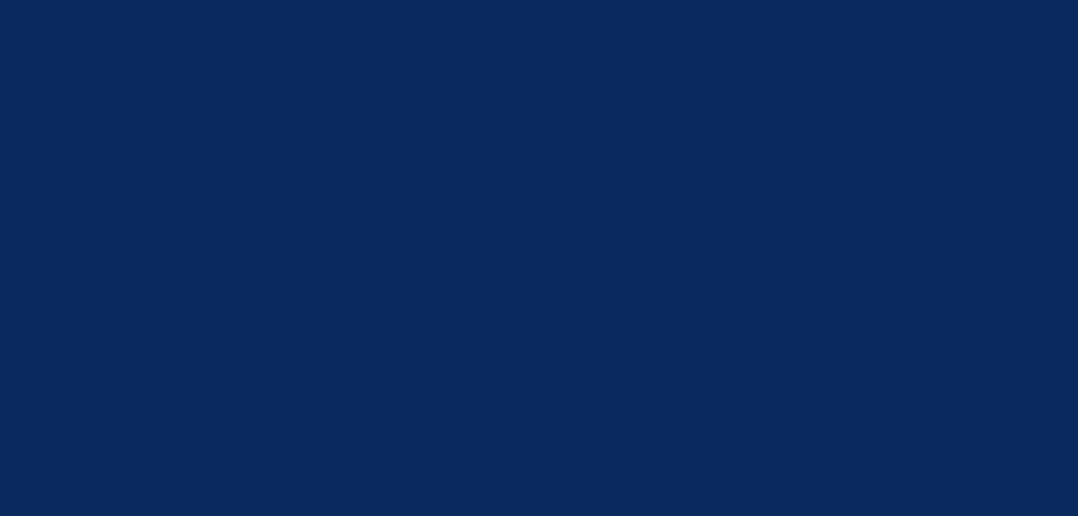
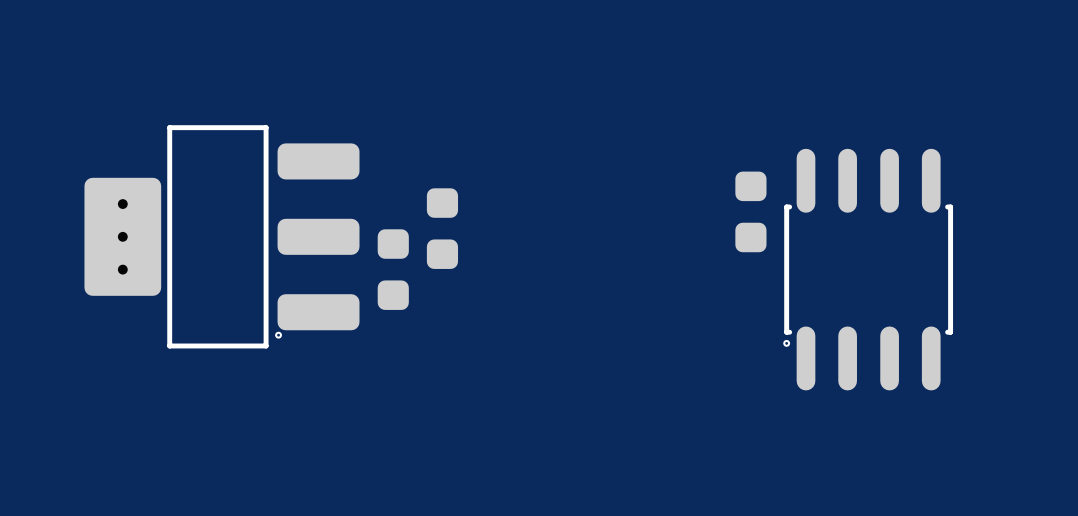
part: none -> (750, 211)
part: none -> (442, 228)
part: none -> (221, 236)
part: none -> (393, 269)
part: none -> (868, 269)

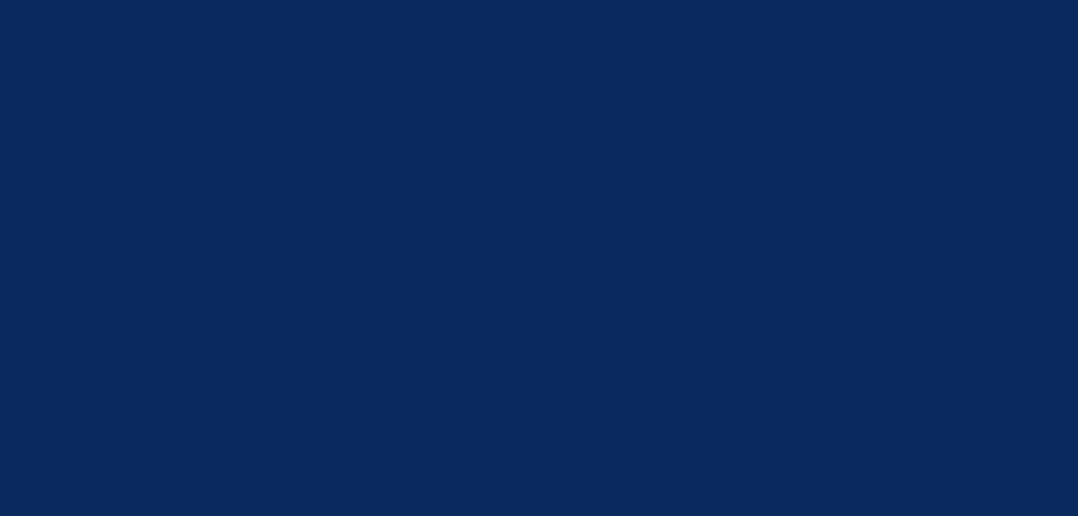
part: (750, 211) -> none
part: (442, 228) -> none
part: (221, 236) -> none
part: (393, 269) -> none
part: (868, 269) -> none

